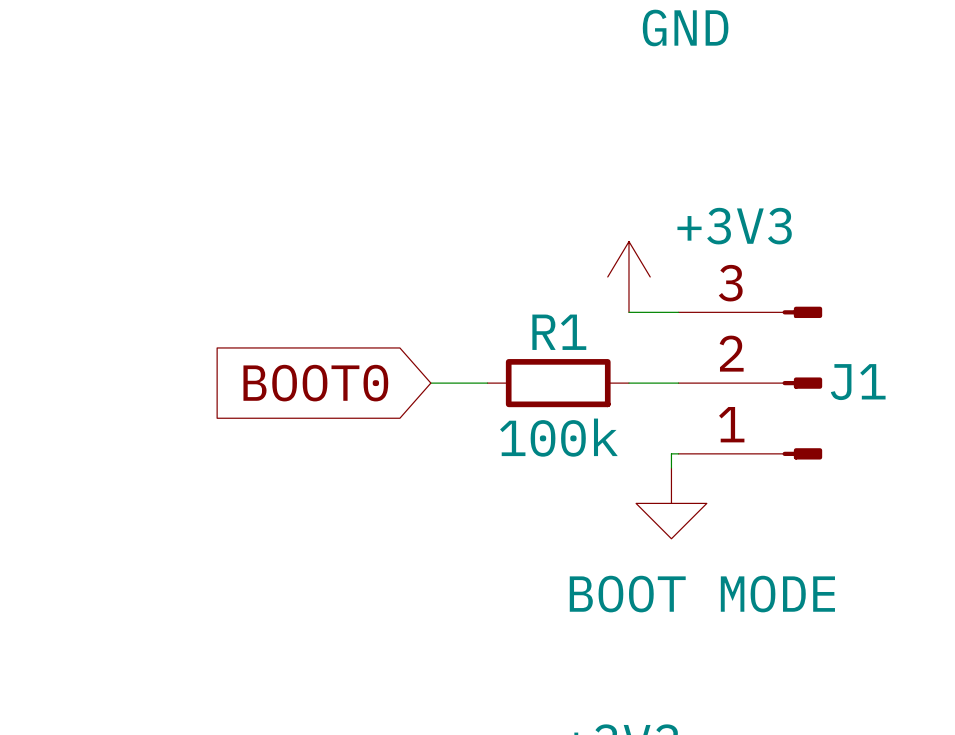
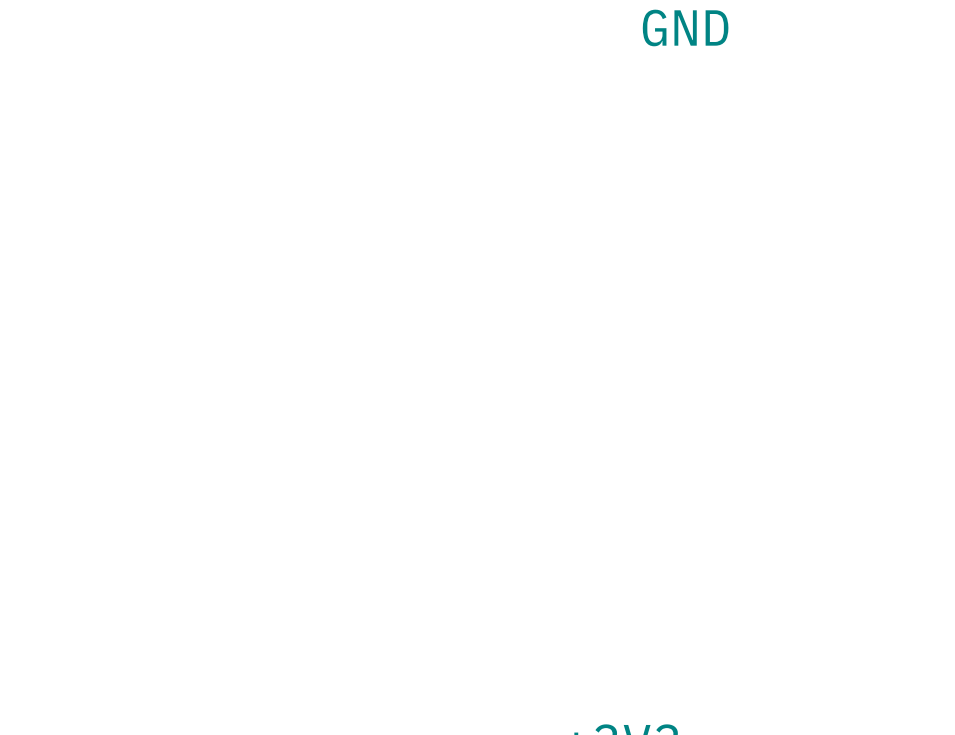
power symbol: +3V3 (628, 276) -> none
wire: (628, 312) (678, 312) -> none
global label: BOOT0 (315, 383) -> none
wire: (430, 383) (487, 383) -> none
R1: 100k (558, 383) -> none
wire: (628, 383) (678, 383) -> none
J1: BOOT MODE (750, 383) -> none
wire: (678, 453) (671, 453) (671, 468) -> none
power symbol: (671, 503) -> none

